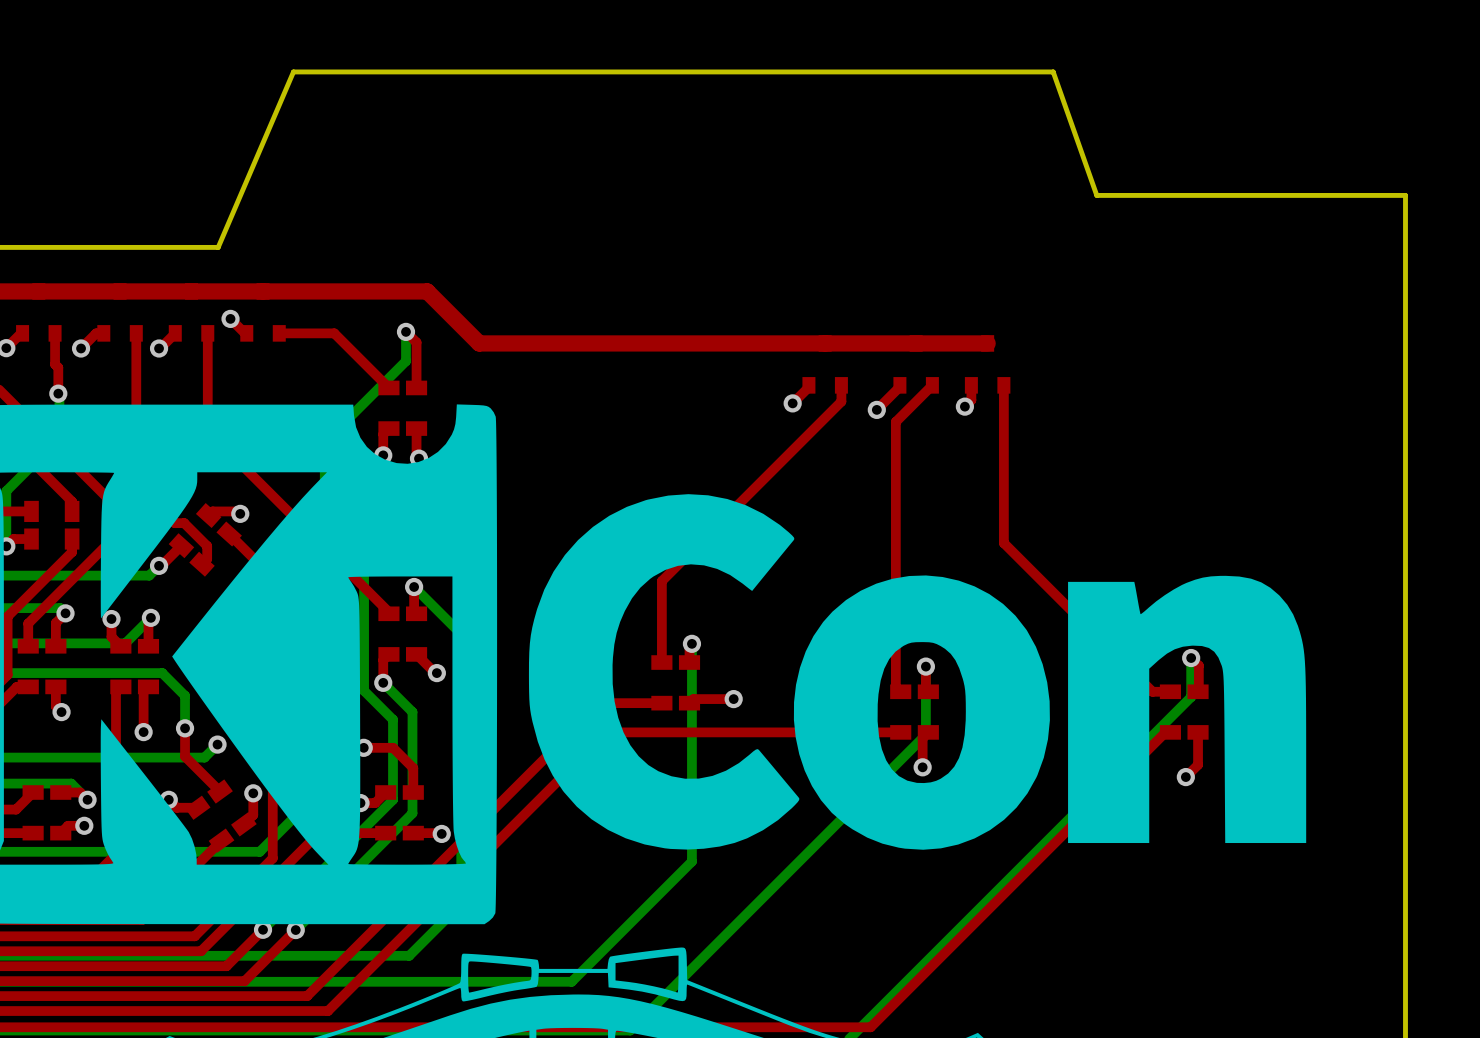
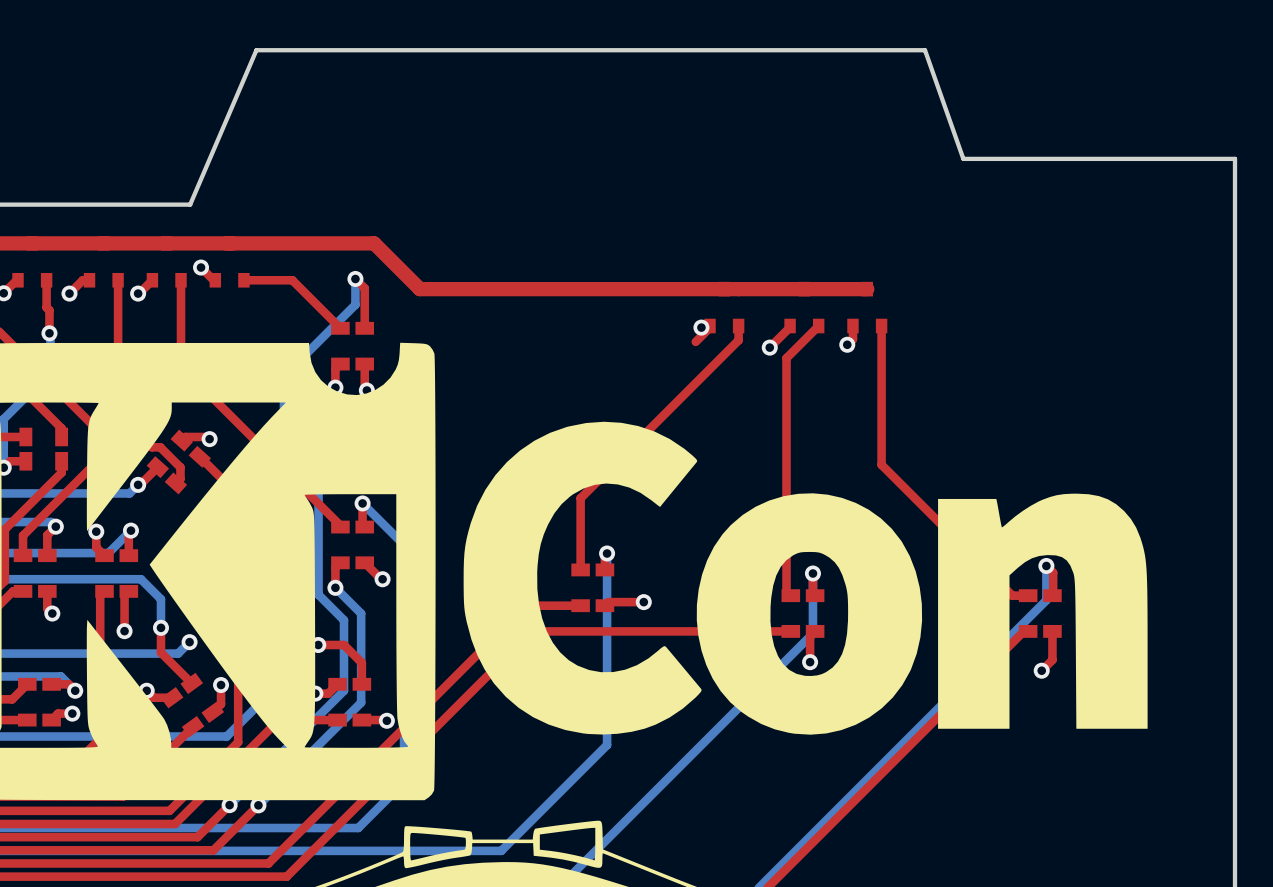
via position: (792, 403) -> (701, 327)

